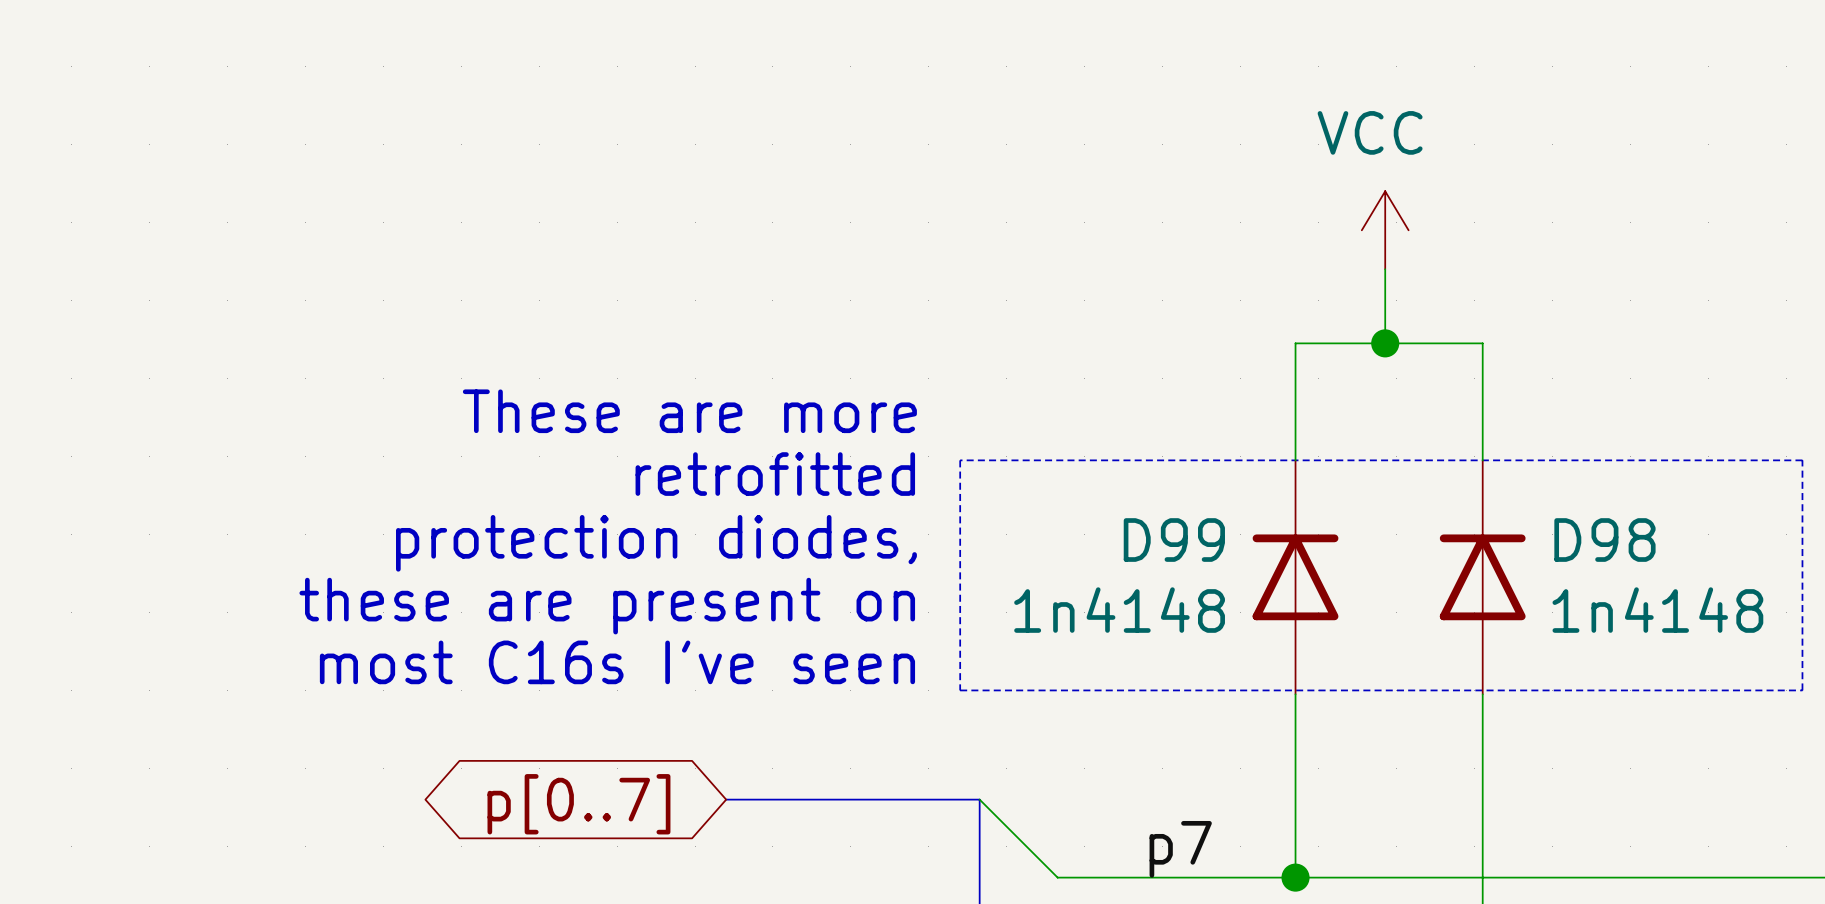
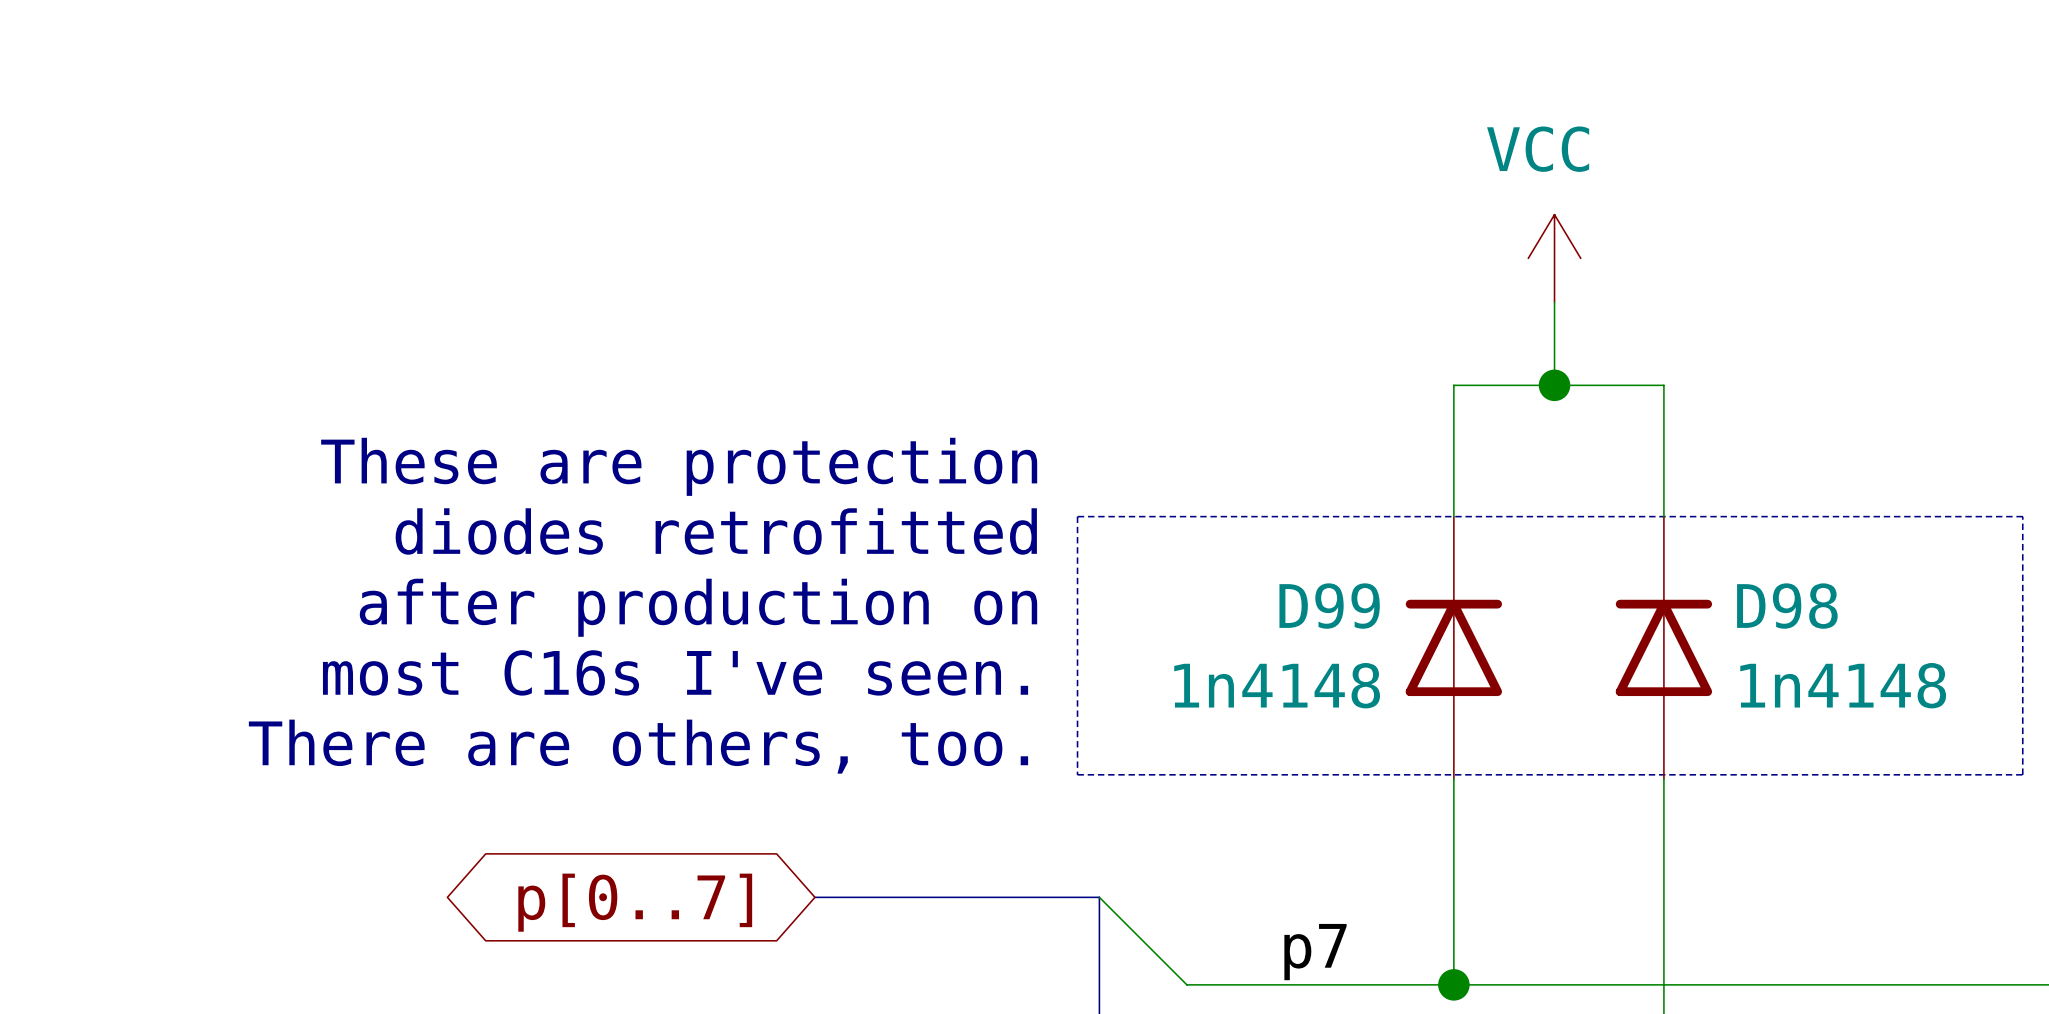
text: These are more (689, 411) -> These are protection (679, 466)
text: retrofitted (775, 474) -> diodes retrofitted (716, 531)
text: protection diodes, (656, 543) -> after production on (698, 607)
text: these are present on (607, 606) -> most C16s I've seen. (675, 672)
text: most C16s I've seen (617, 662) -> There are others, too. (638, 746)

